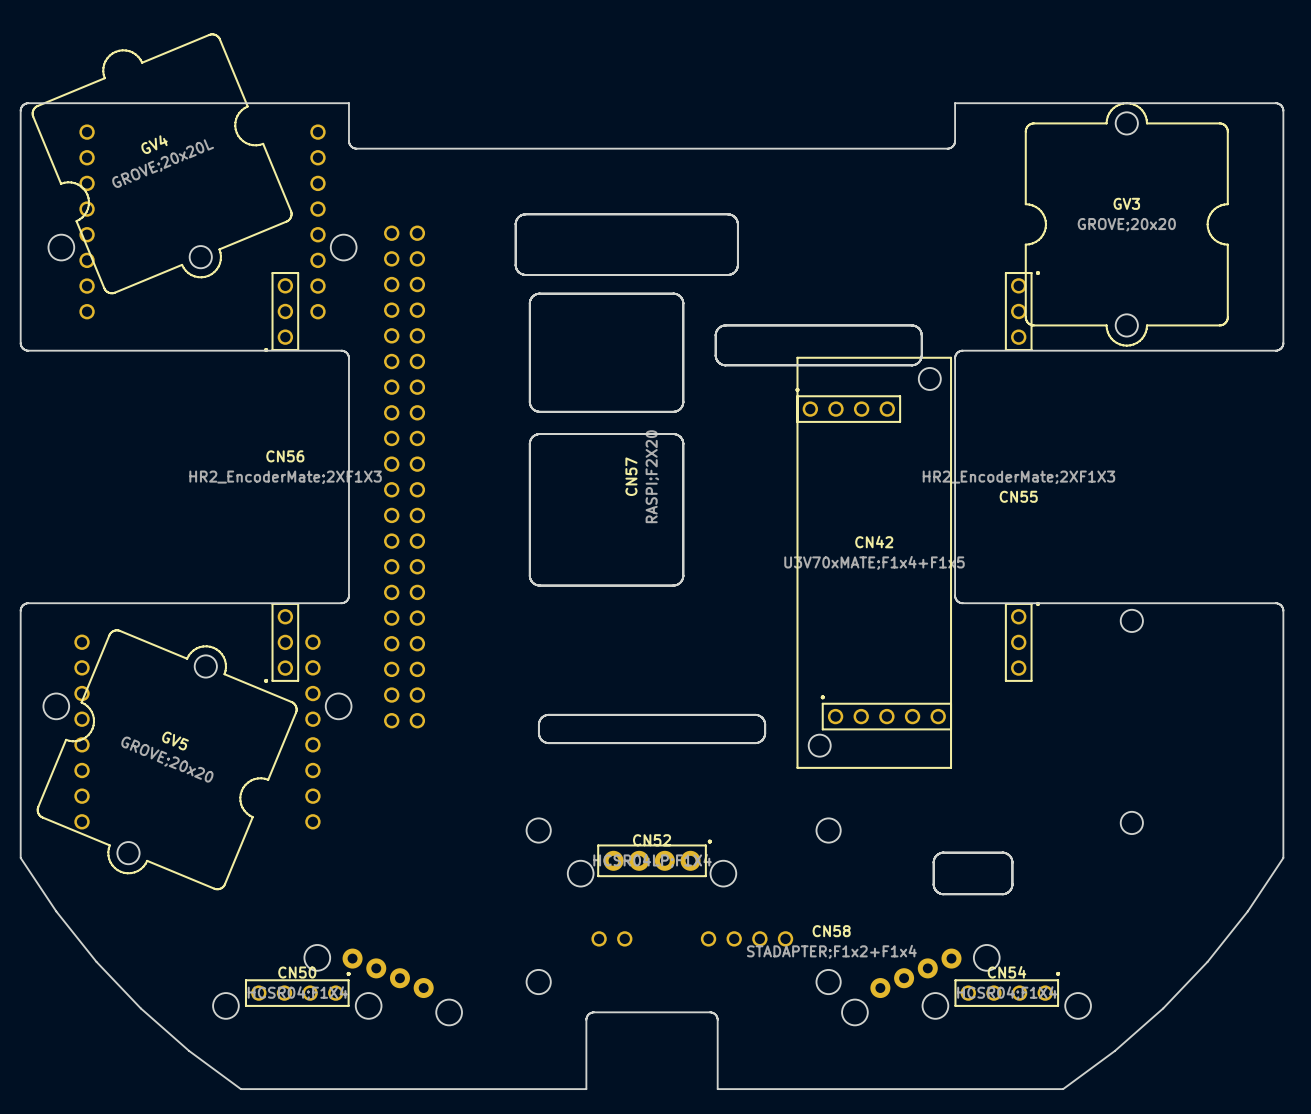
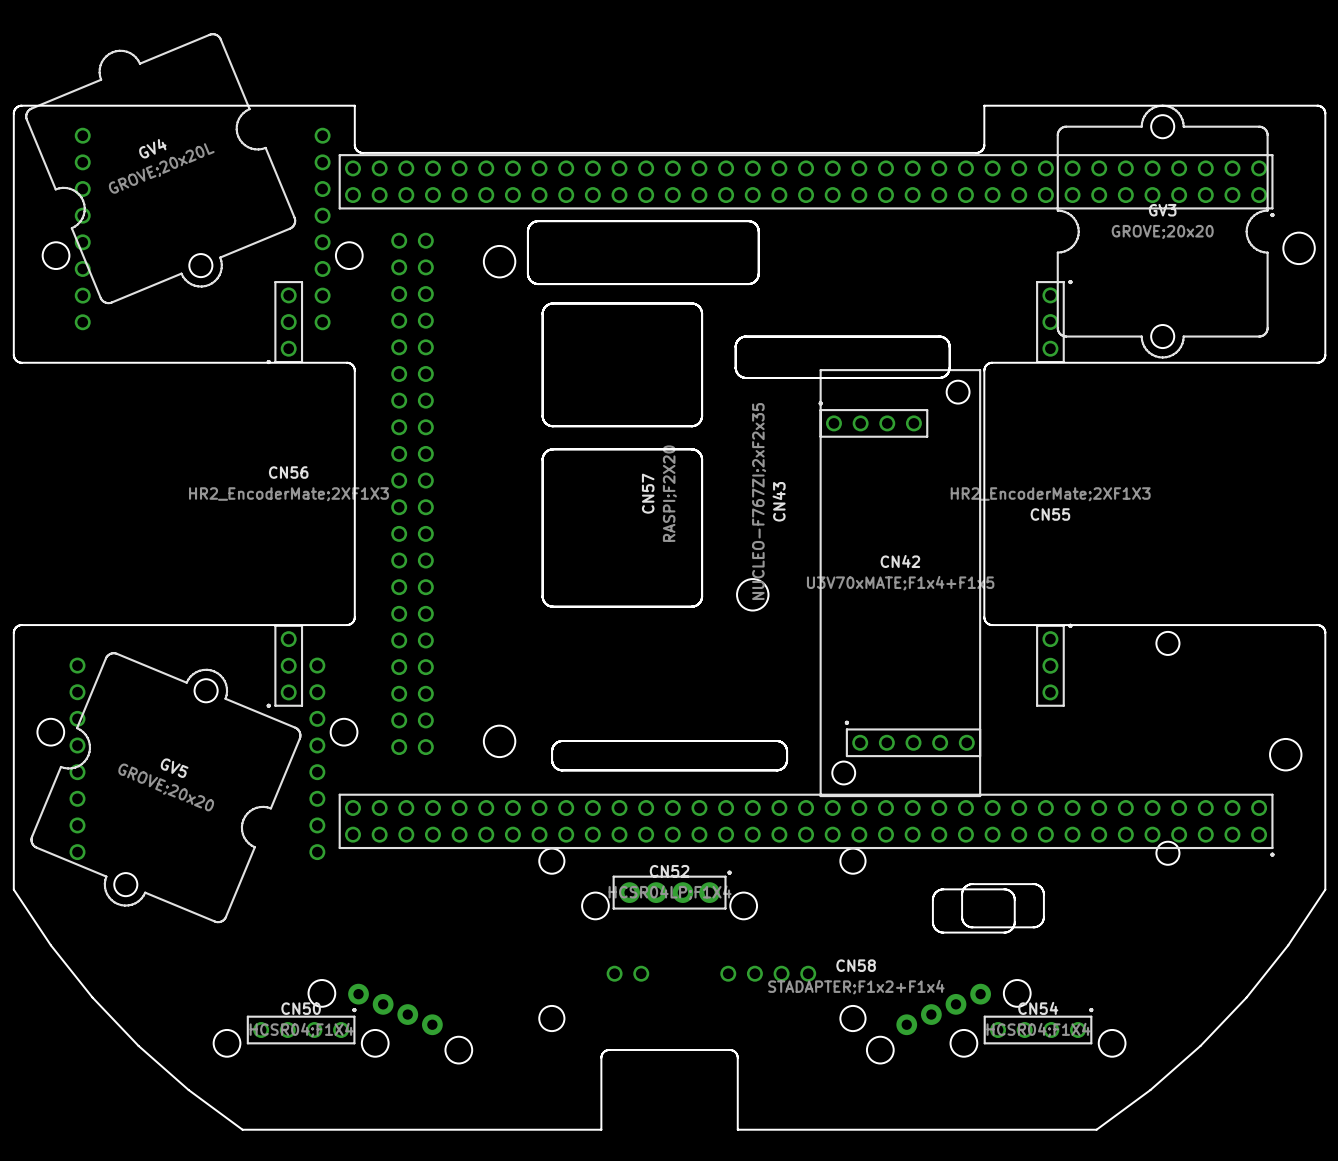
CN43: none -> NUCLEO-F767ZI;2xF2x35 (826, 505)
board edge: (942, 852) (1007, 853) (1012, 861) (1011, 888) (1003, 894) (938, 892) (933, 885) (933, 861) (936, 855) (942, 852) -> (942, 889) (1009, 890) (1014, 898) (1013, 926) (1005, 932) (938, 931) (932, 923) (932, 898) (935, 892) (942, 889)

